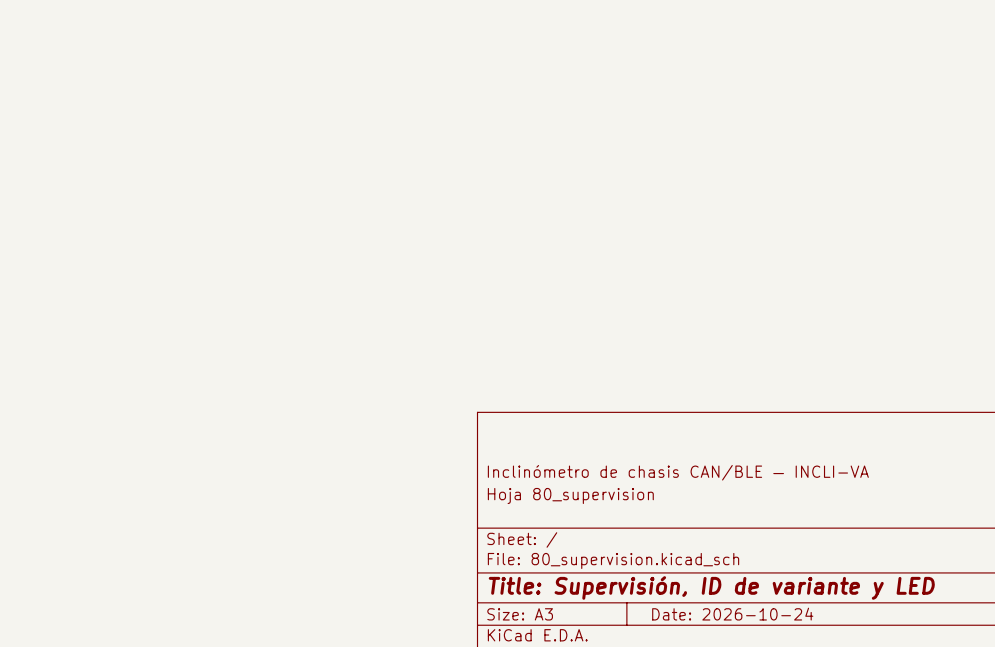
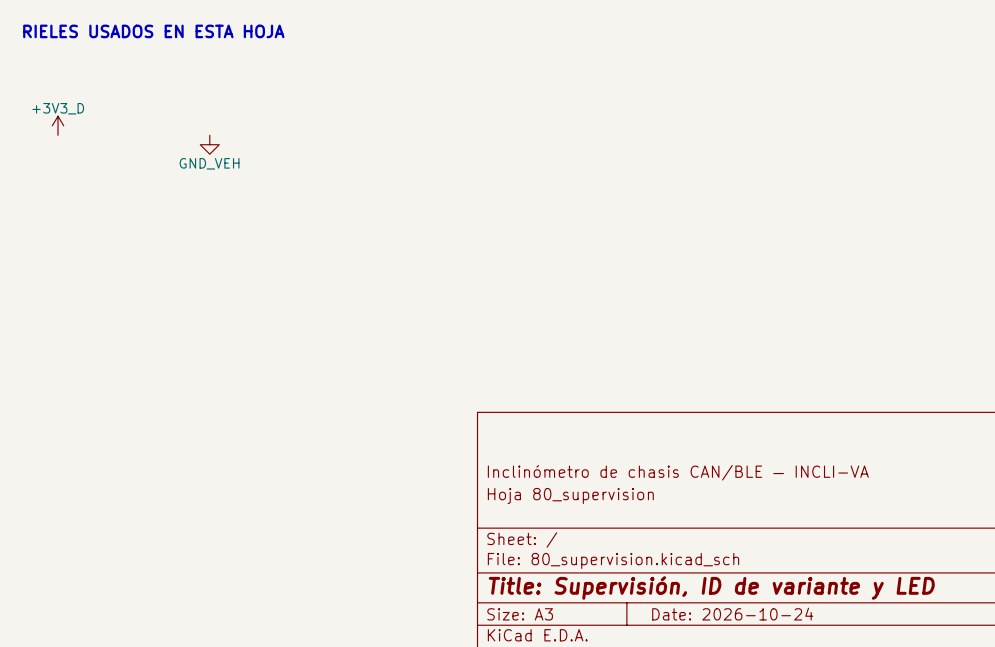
text: none -> RIELES USADOS EN ESTA HOJA (153, 31)
power symbol: none -> +3V3_D (58, 125)
power symbol: none -> GND_VEH (209, 144)

